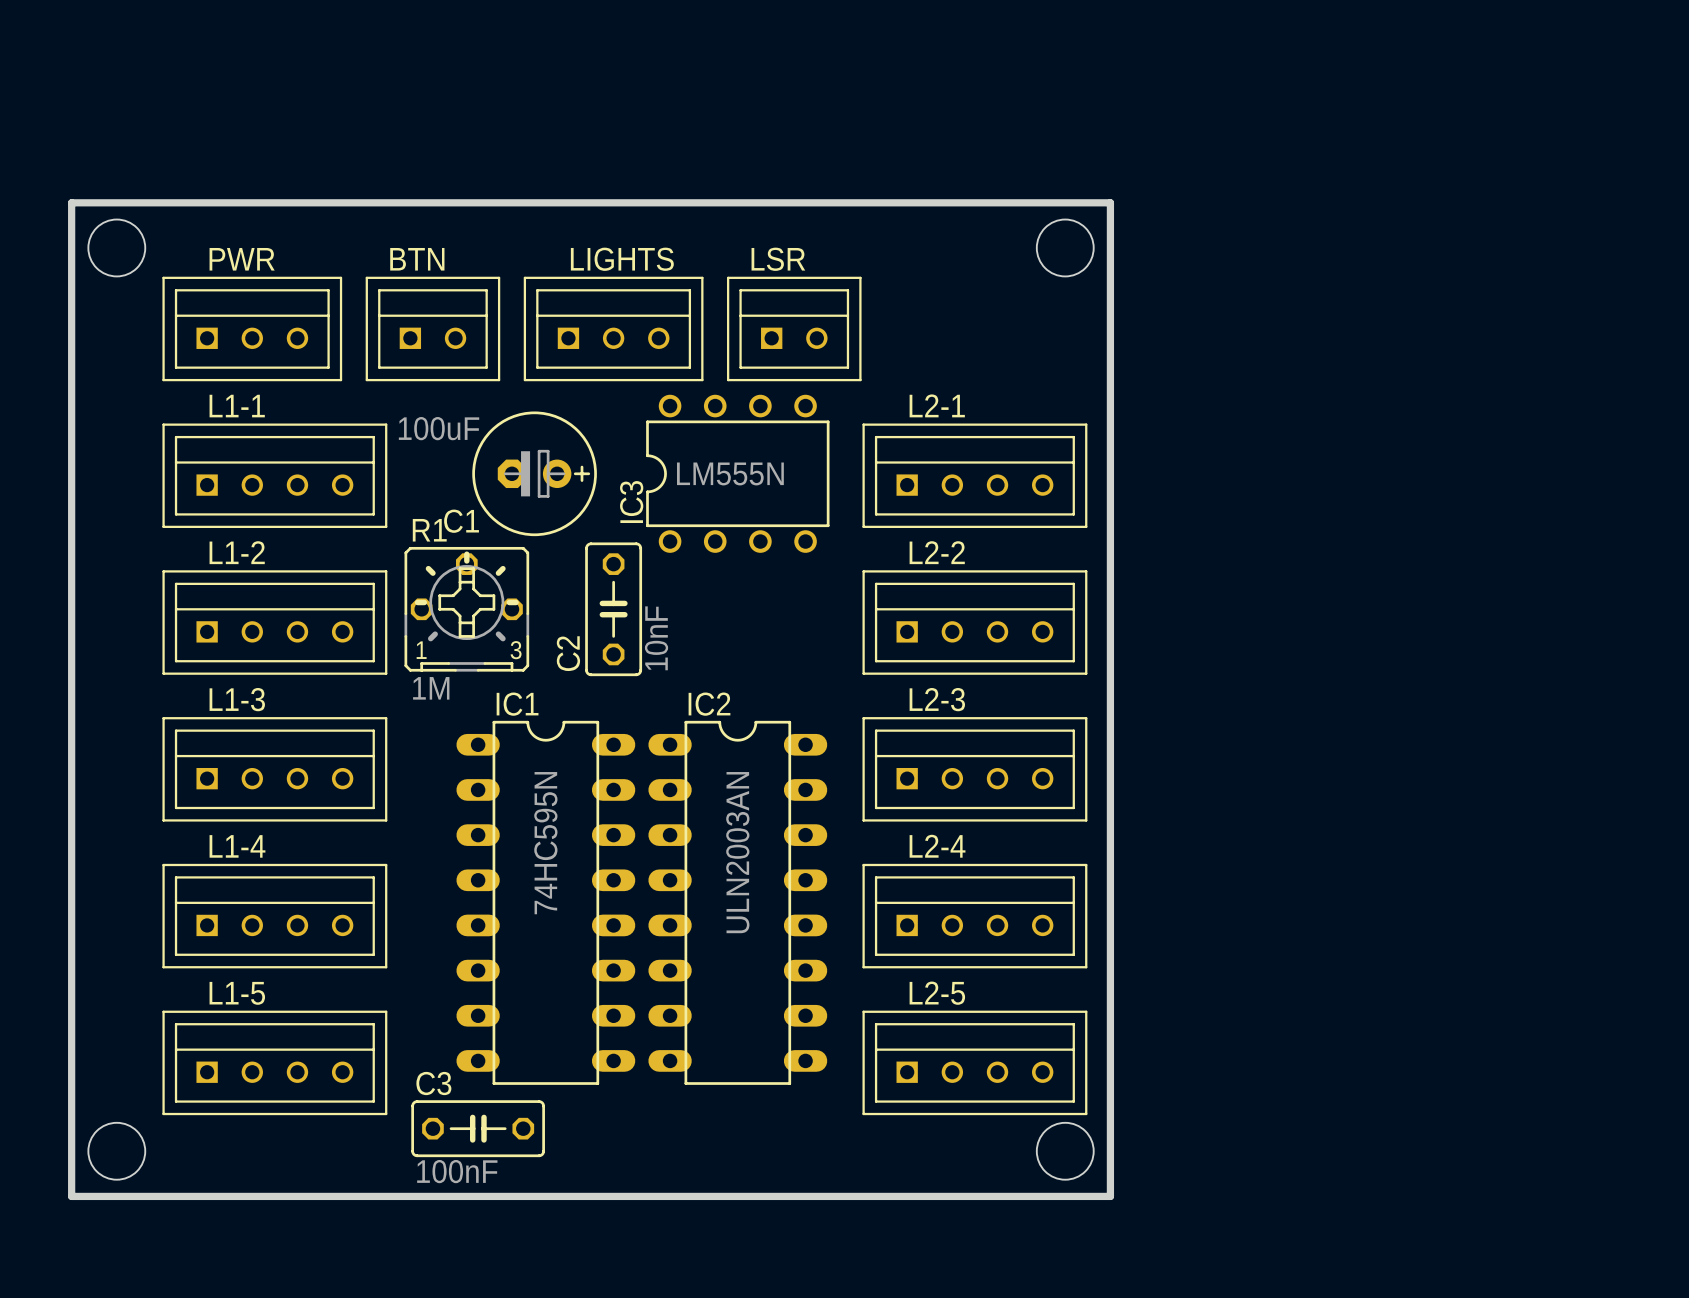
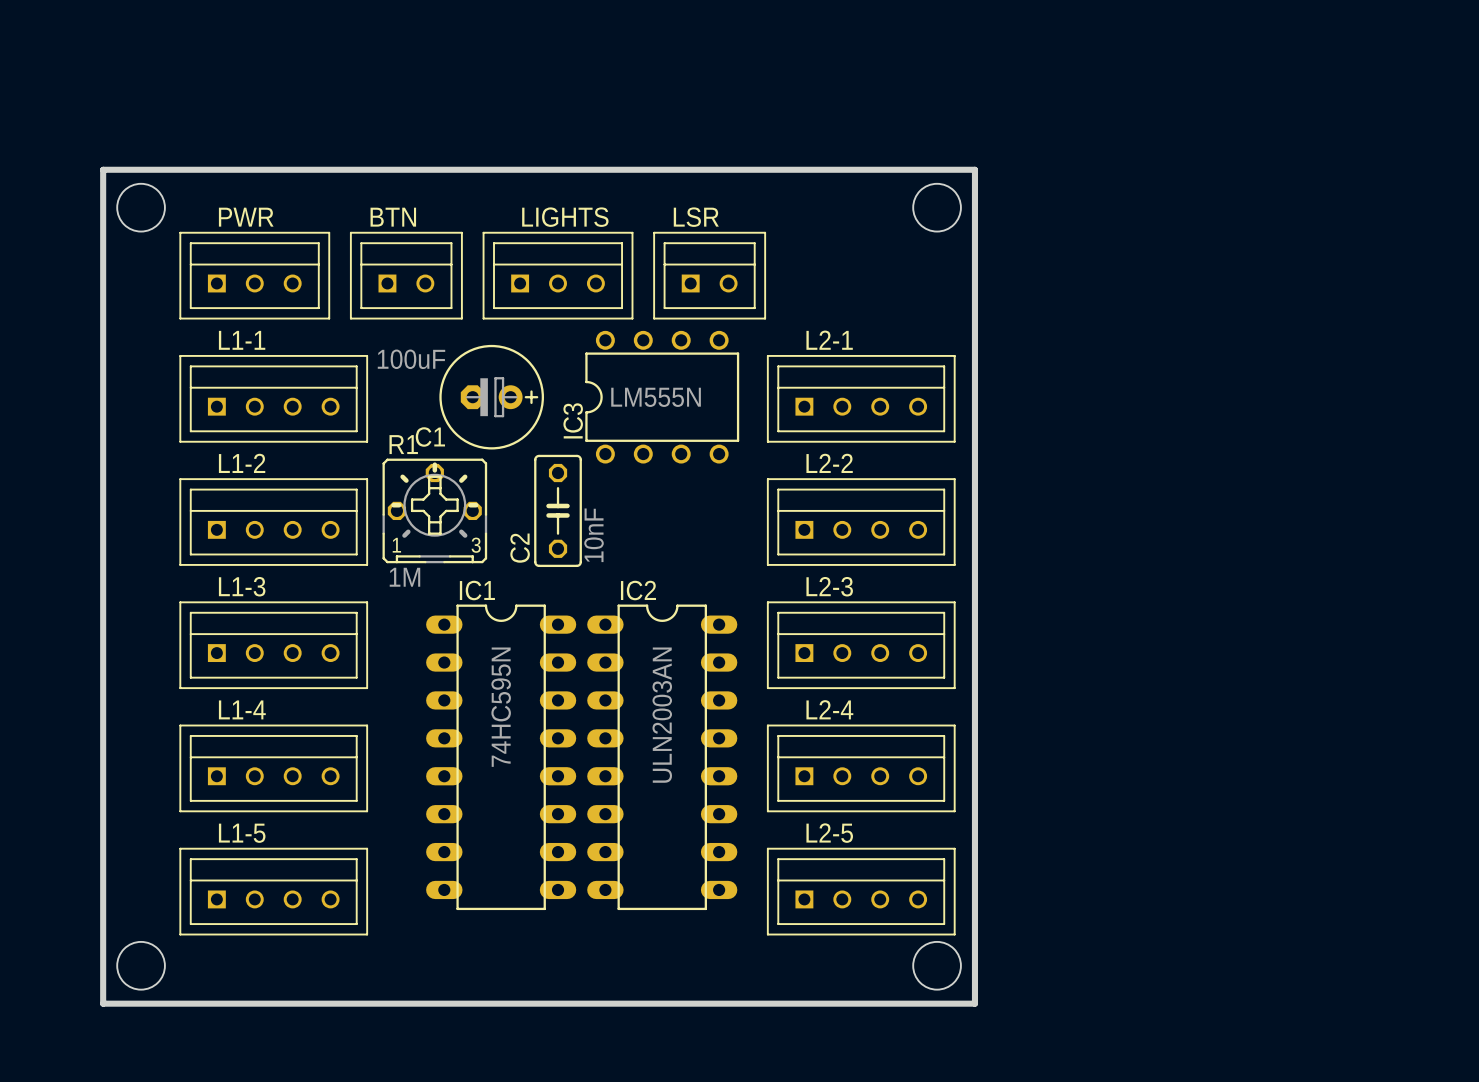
C3: 100nF (478, 1128) -> none

